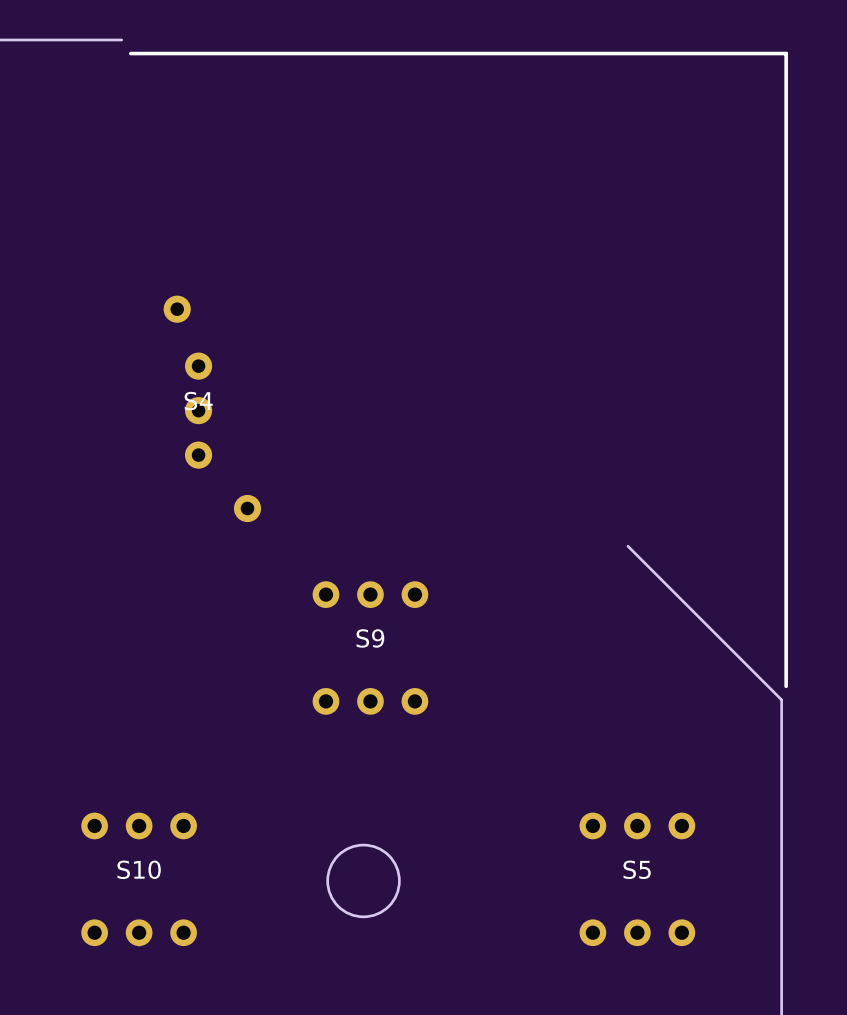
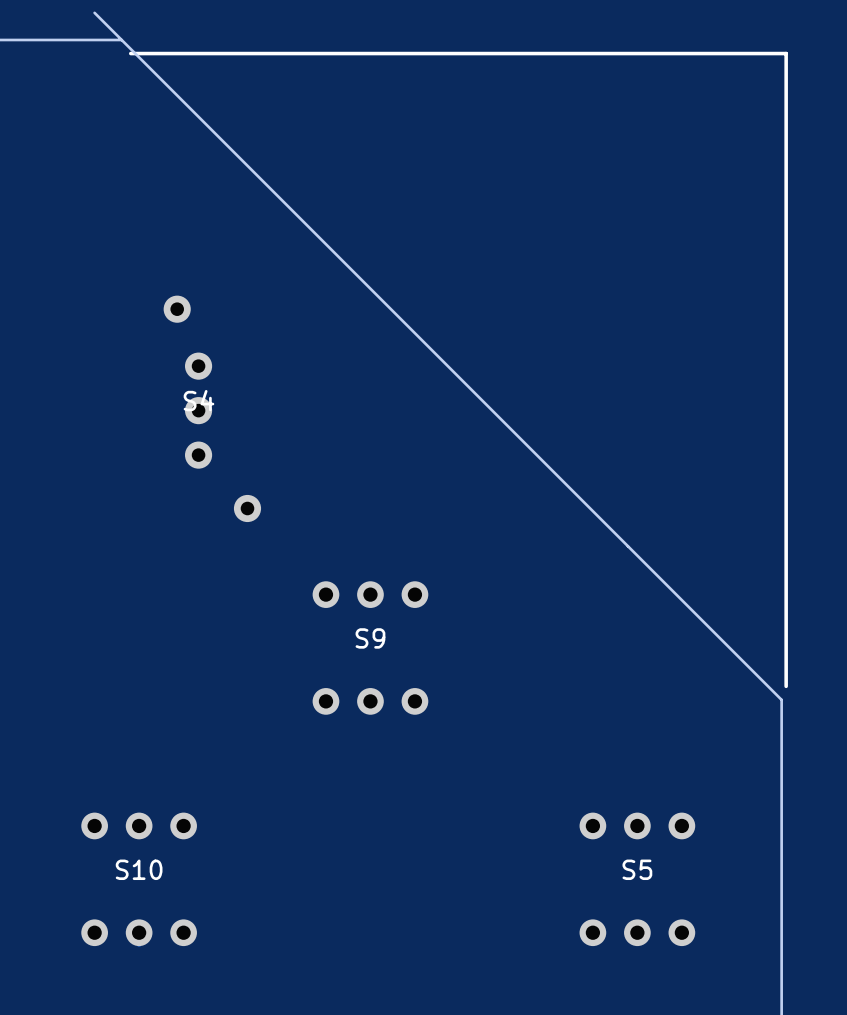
board edge: none -> (94, 12) (627, 546)
round board edge: [326, 843, 401, 919] -> none

